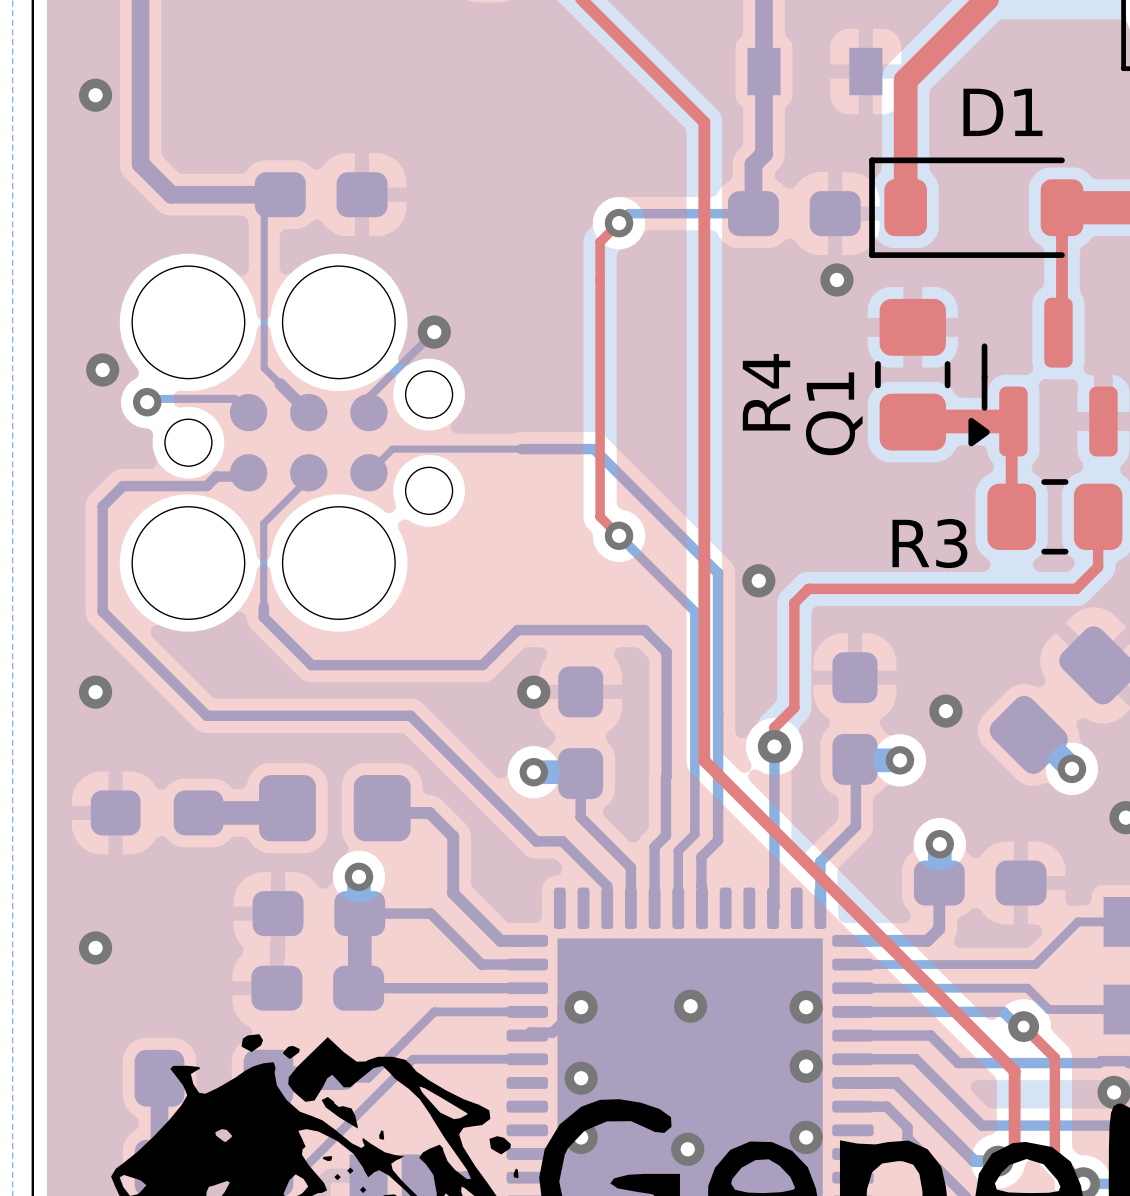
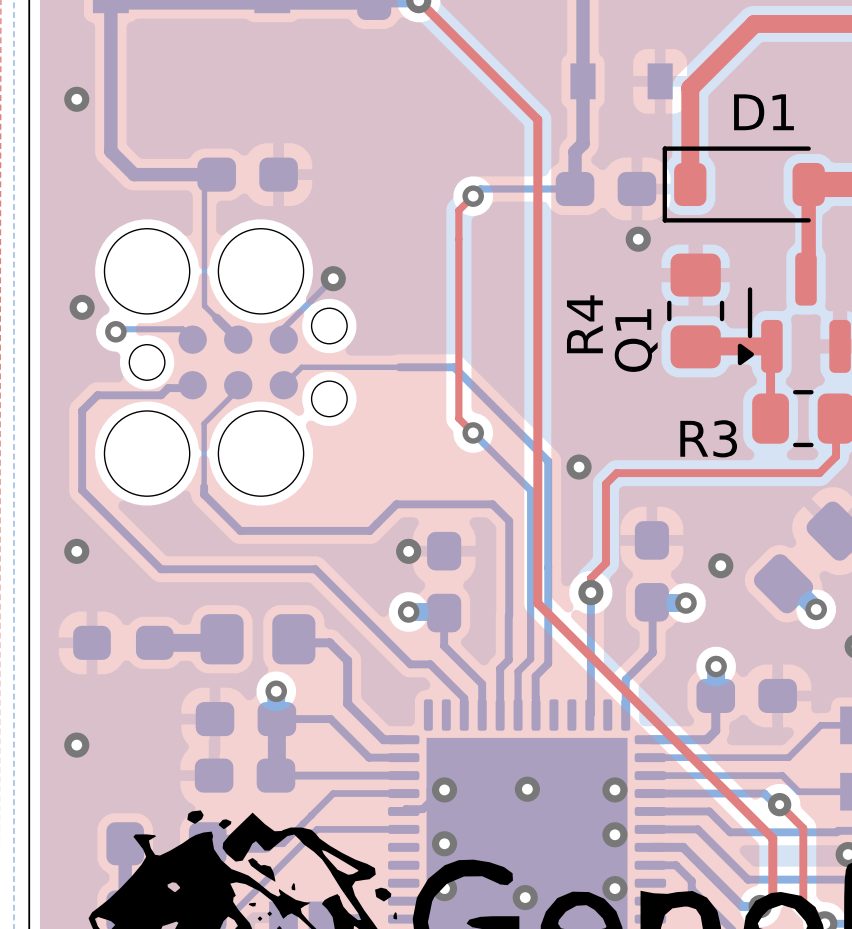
top track width: thin (1061, 207) (1061, 329) -> thick (808, 184) (808, 276)

